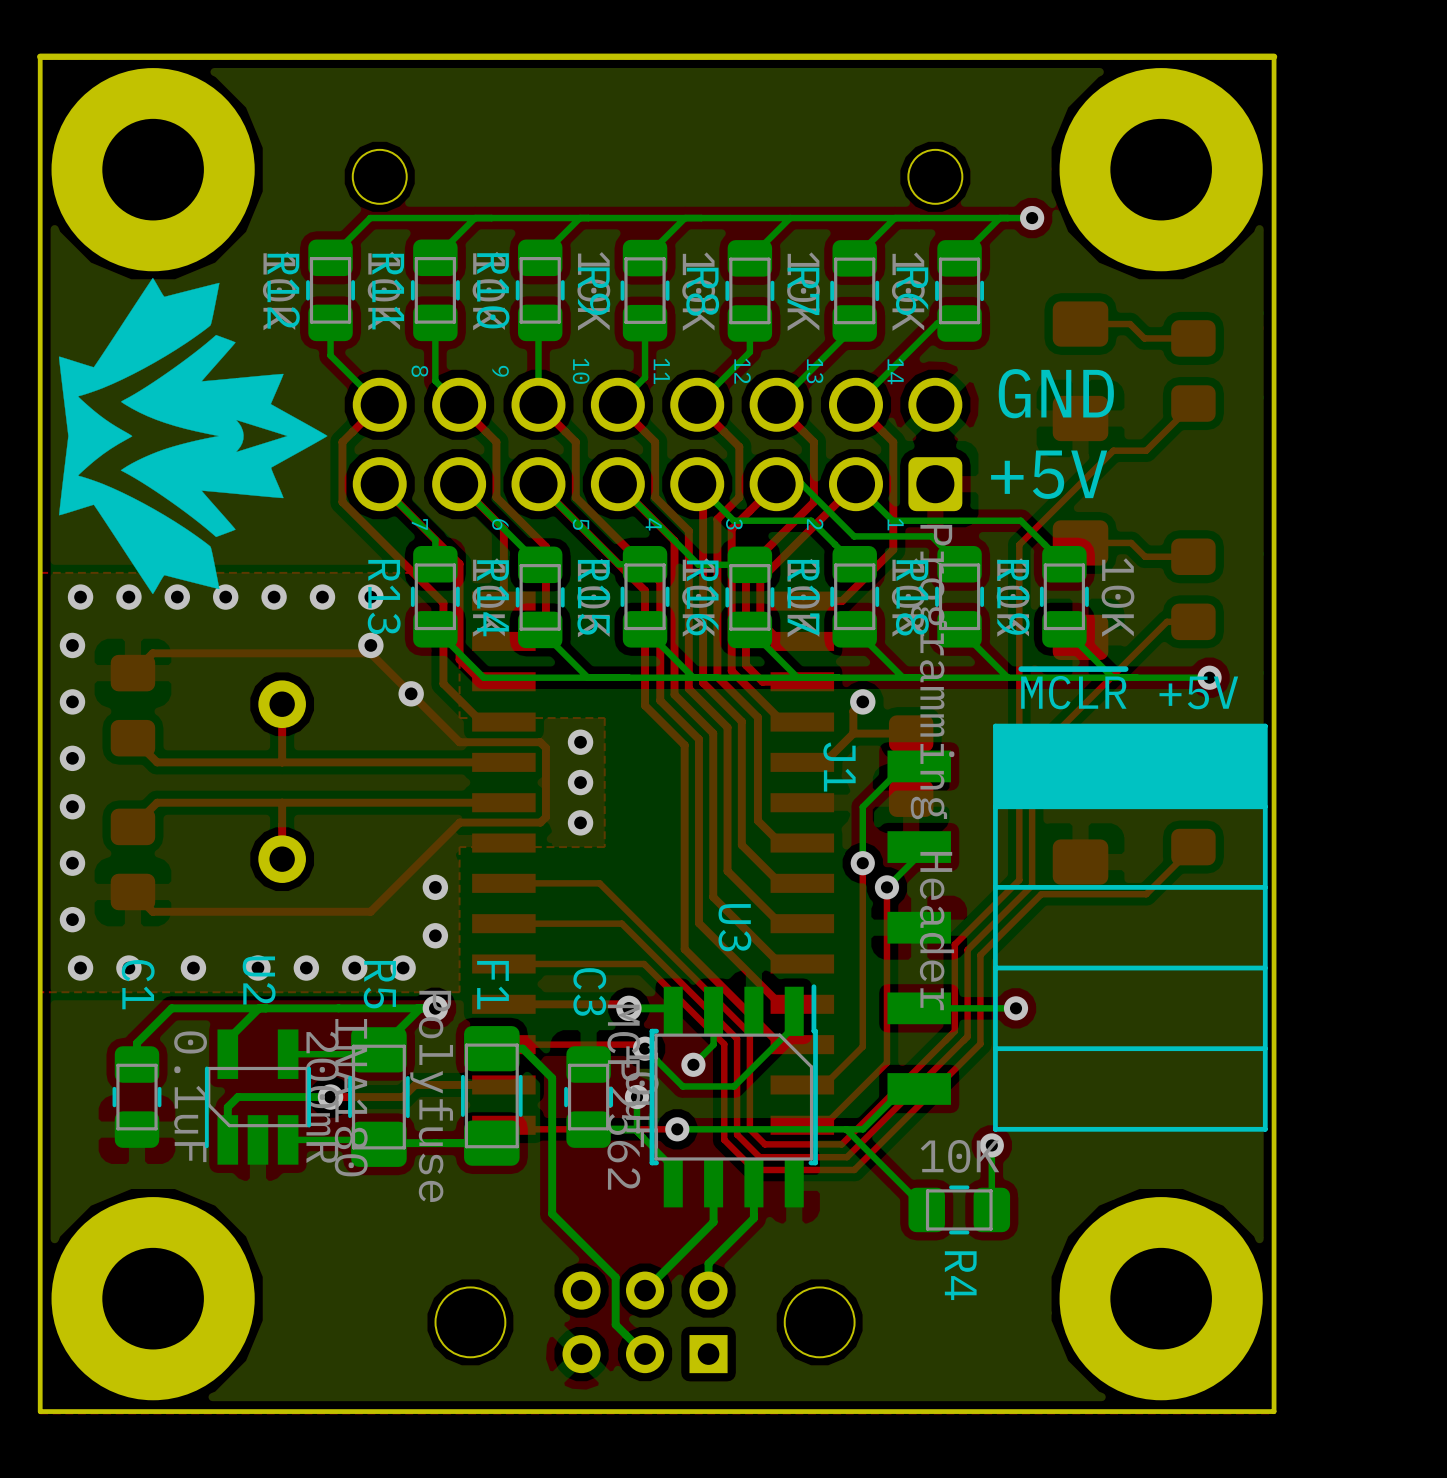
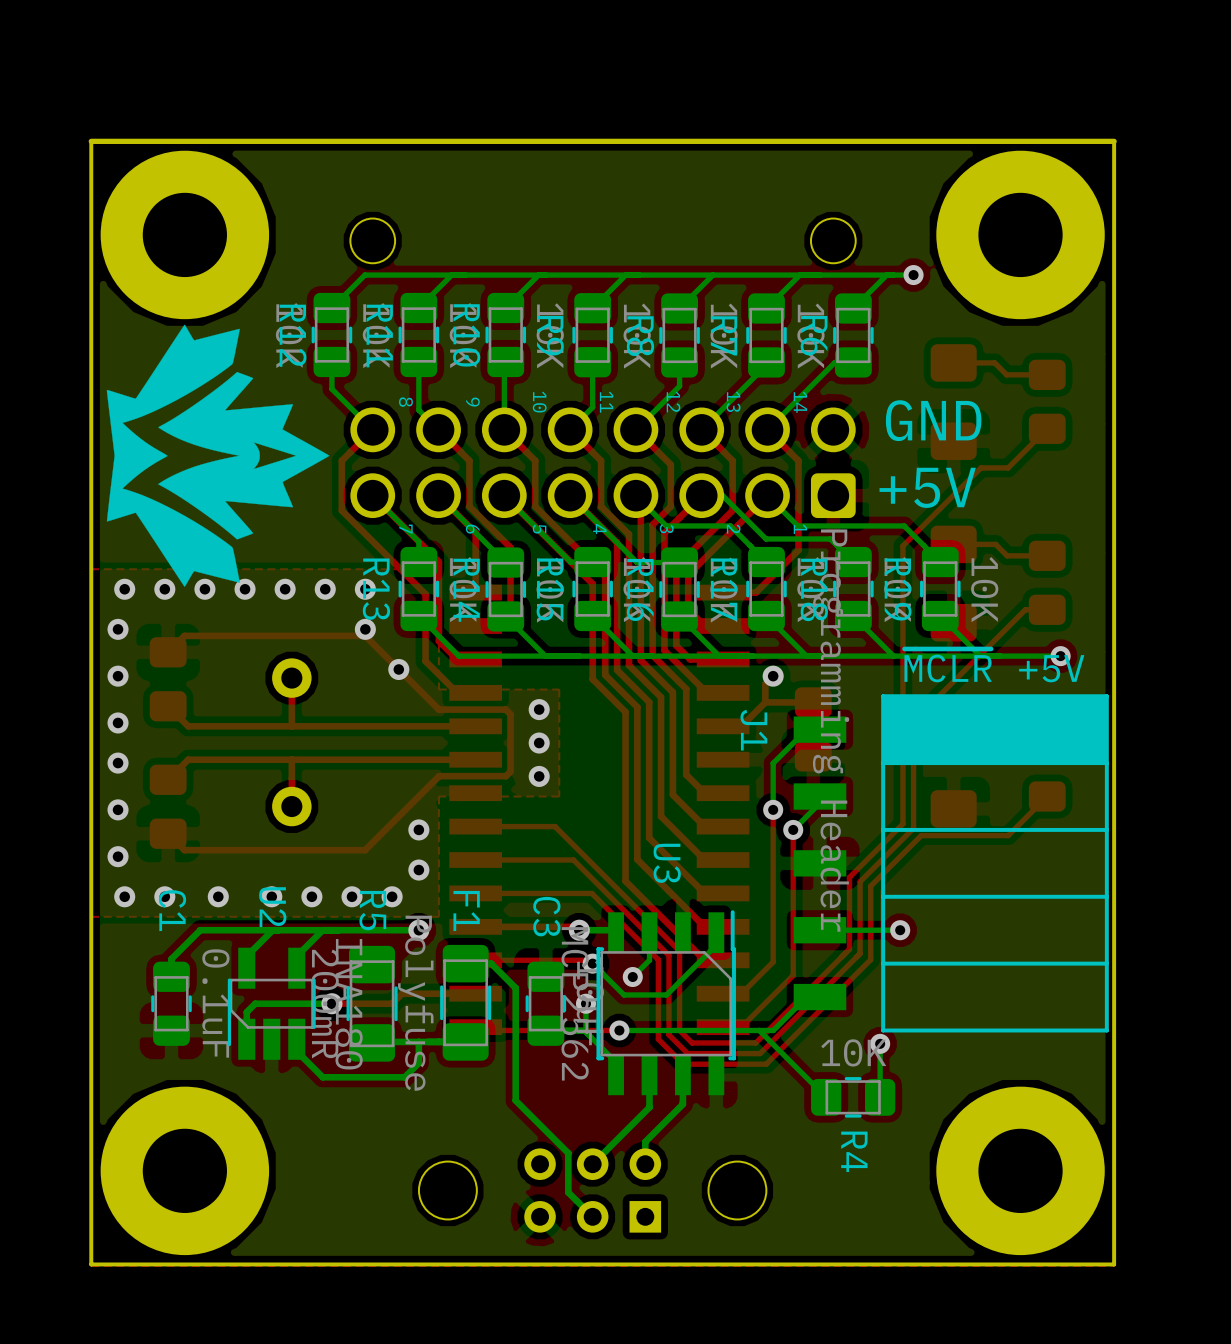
bottom track: (420, 1008) (374, 1054) (288, 1054) -> (322, 930) (296, 956) (296, 968)
bottom track: (288, 1139) (374, 1139) (378, 1144) -> (296, 1039) (296, 1051) (322, 1077) (404, 1077) (418, 1063) (418, 1041)

